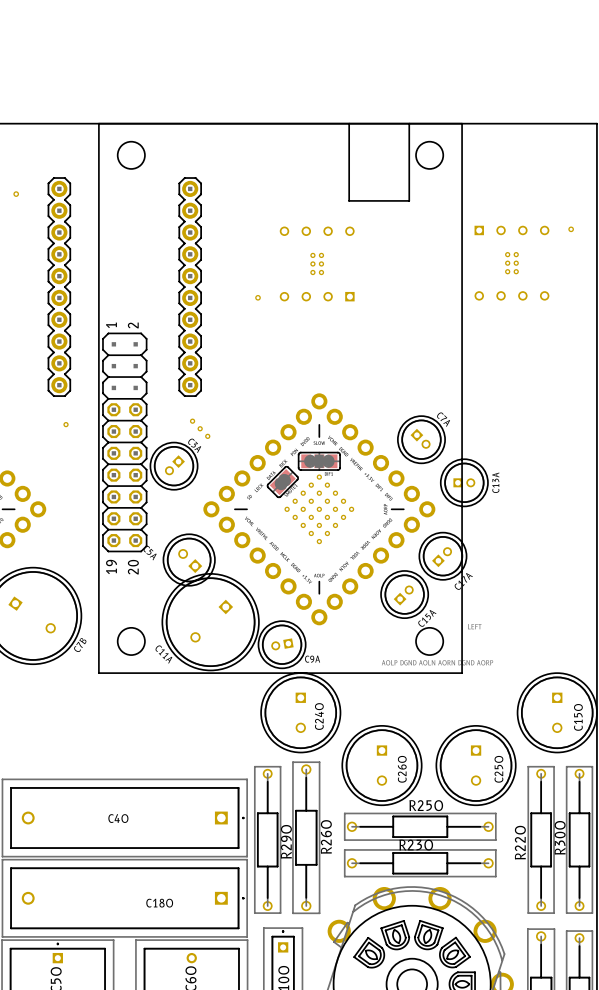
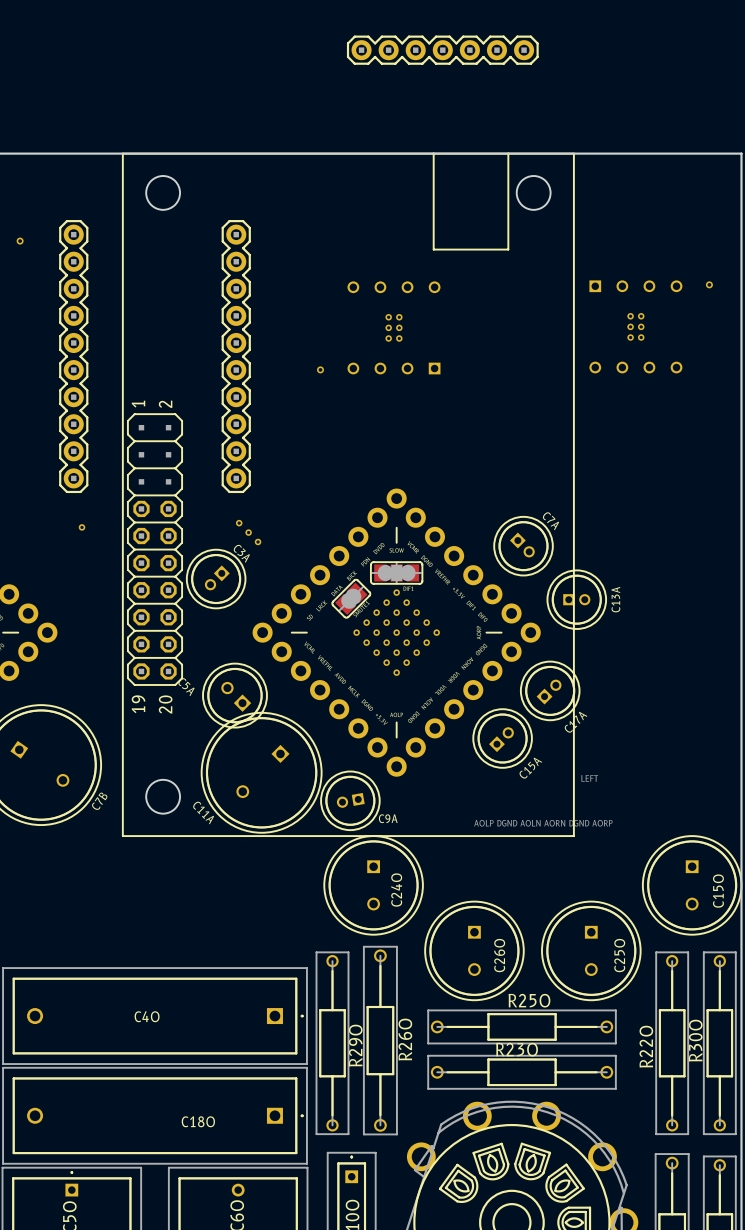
part: none -> (442, 50)
part footprint: [98, 123, 463, 674] -> [122, 152, 575, 837]

